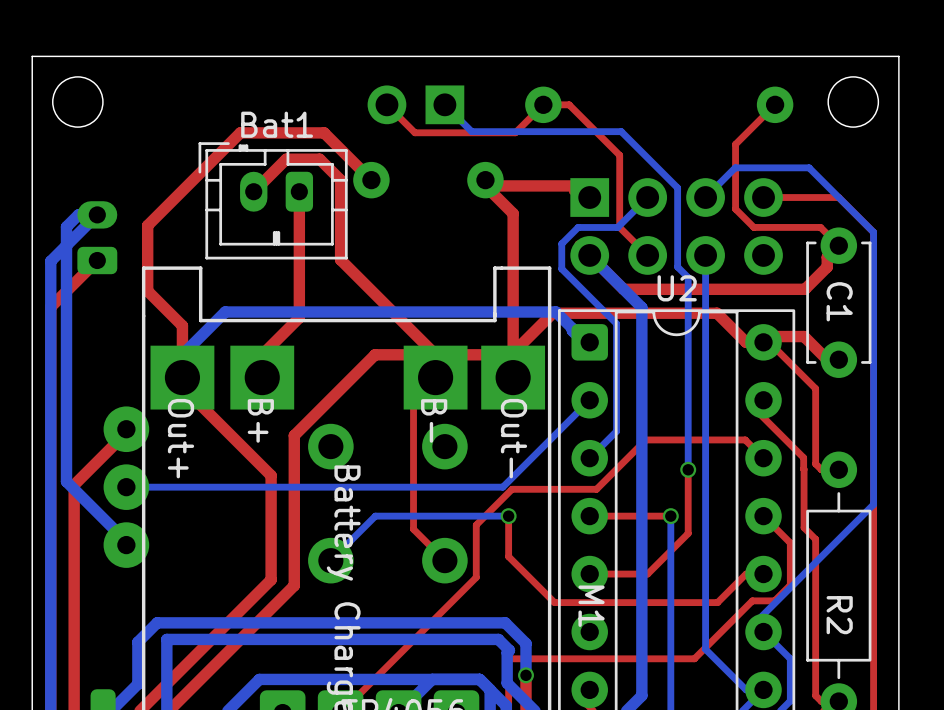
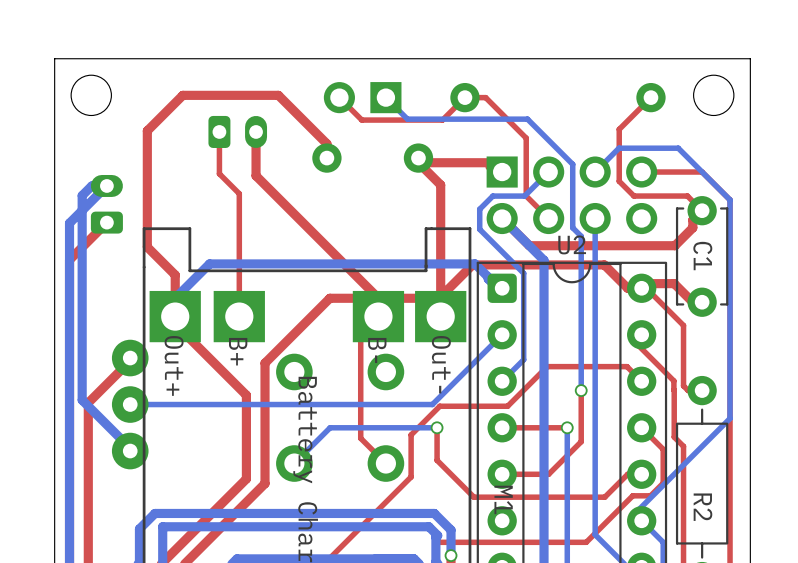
top track: none -> (219, 131) (219, 173) (239, 193) (239, 316)
top track: (371, 180) (324, 132) (240, 132) (147, 225) -> (326, 158) (326, 143) (278, 95) (182, 95) (147, 130) (147, 194)
top track: (253, 191) (286, 159) (319, 159) (340, 180) (340, 259) -> (256, 131) (256, 175) (302, 222)
top track: (299, 191) (299, 317) (262, 354) -> none
Bat1 side: bottom (273, 200) -> top (237, 131)

